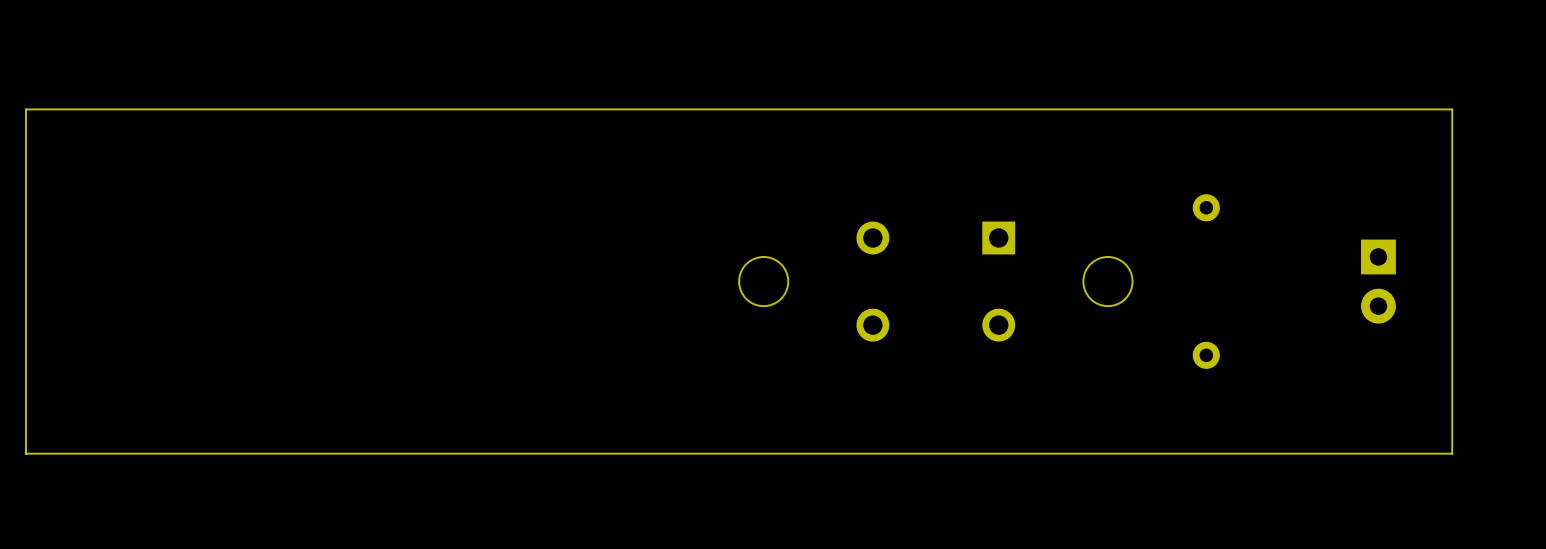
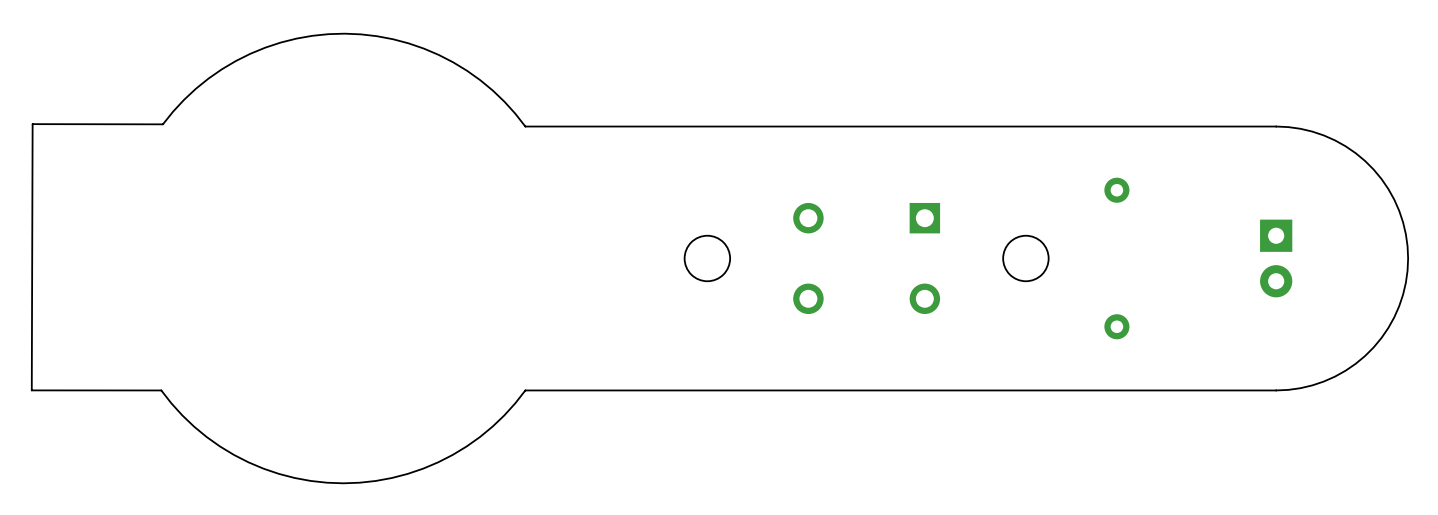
board edge: (1452, 109) (25, 109) (25, 453) (1452, 453) (1452, 109) -> (32, 124) (162, 124) (184, 99) (208, 78) (250, 53) (296, 38) (344, 33) (376, 36) (408, 43) (453, 62) (492, 90) (525, 126) (1288, 127) (1312, 131) (1334, 140) (1365, 160) (1381, 178) (1394, 199) (1403, 222) (1407, 246) (1407, 270) (1399, 306) (1388, 327) (1373, 347) (1355, 363) (1334, 376) (1300, 388) (1276, 390) (525, 390) (492, 426) (466, 446) (438, 462) (391, 478) (359, 482) (327, 482) (278, 473) (233, 454) (194, 426) (161, 390) (31, 390) (32, 124)

